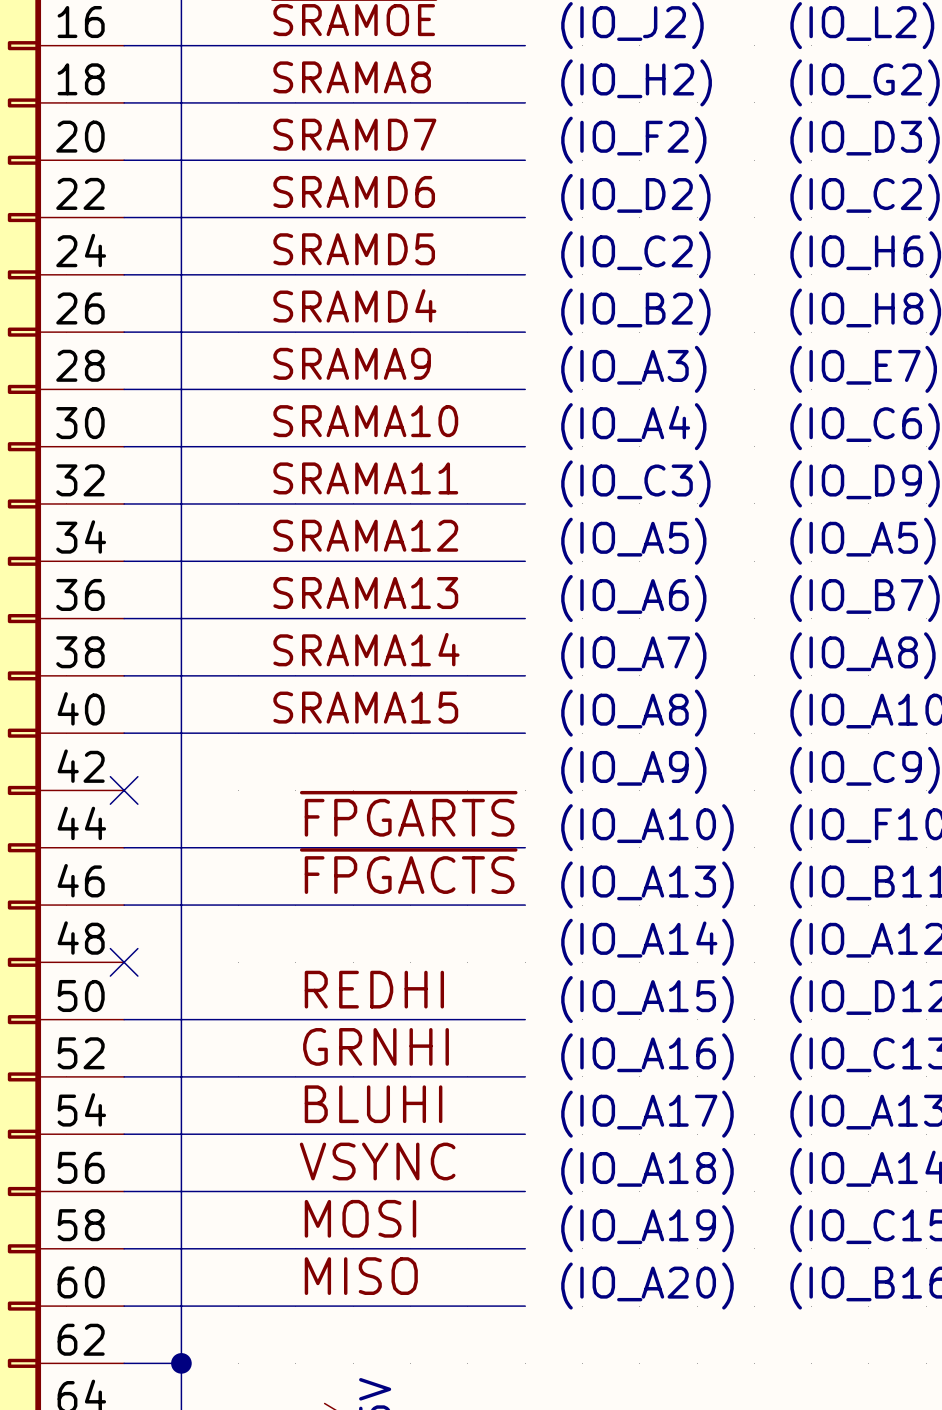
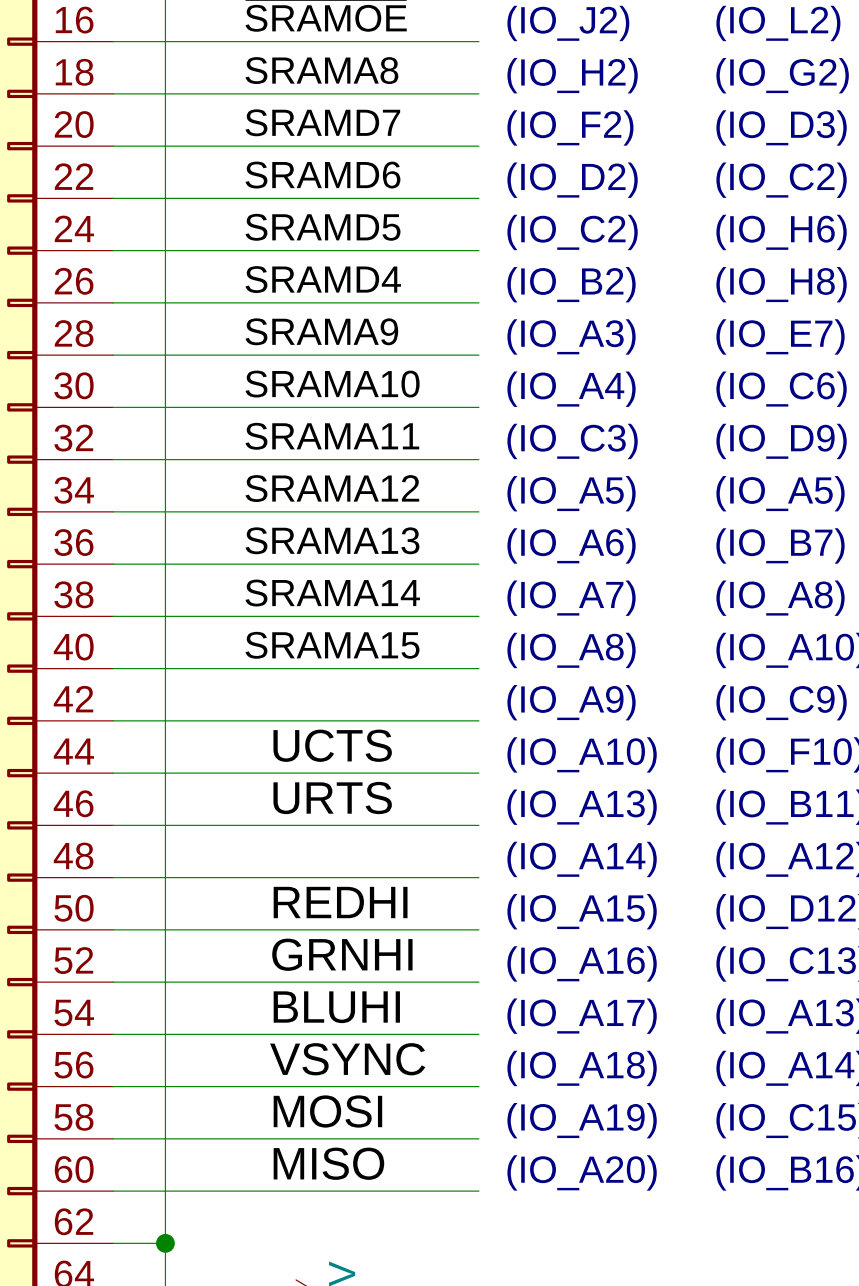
wire: none -> (113, 720) (478, 720)
no-connect mark: (124, 790) -> none
label: ~{FPGARTS} (408, 813) -> UCTS (332, 745)
label: ~{FPGACTS} (408, 871) -> URTS (332, 798)
wire: none -> (113, 877) (478, 877)
no-connect mark: (124, 962) -> none

